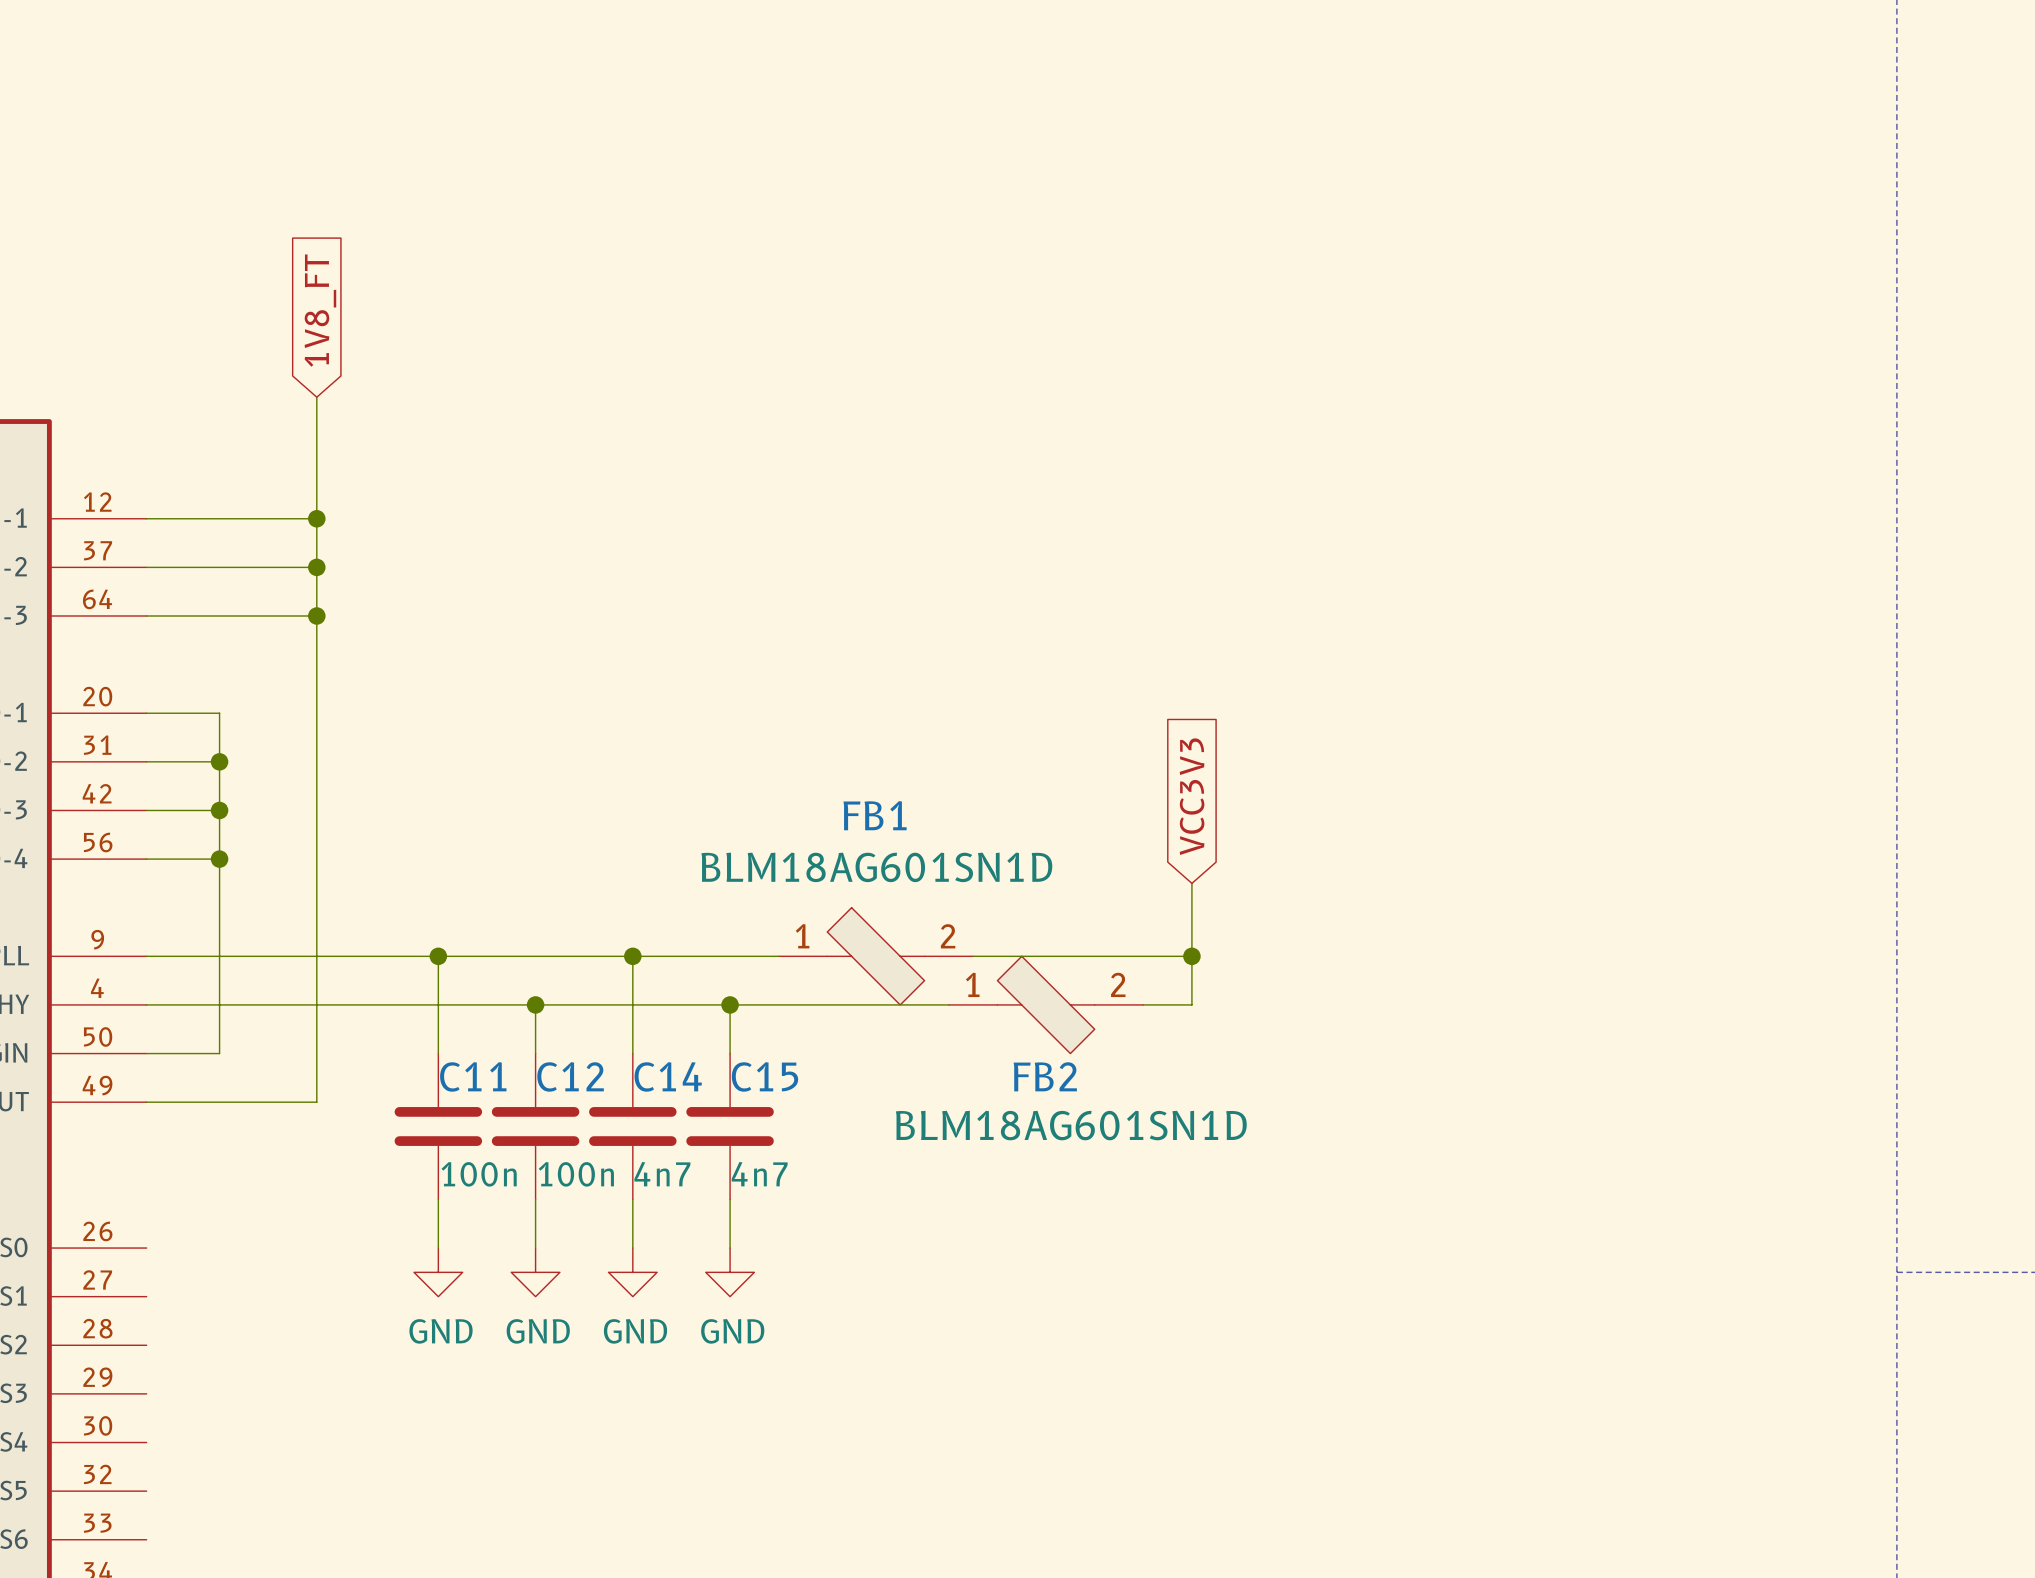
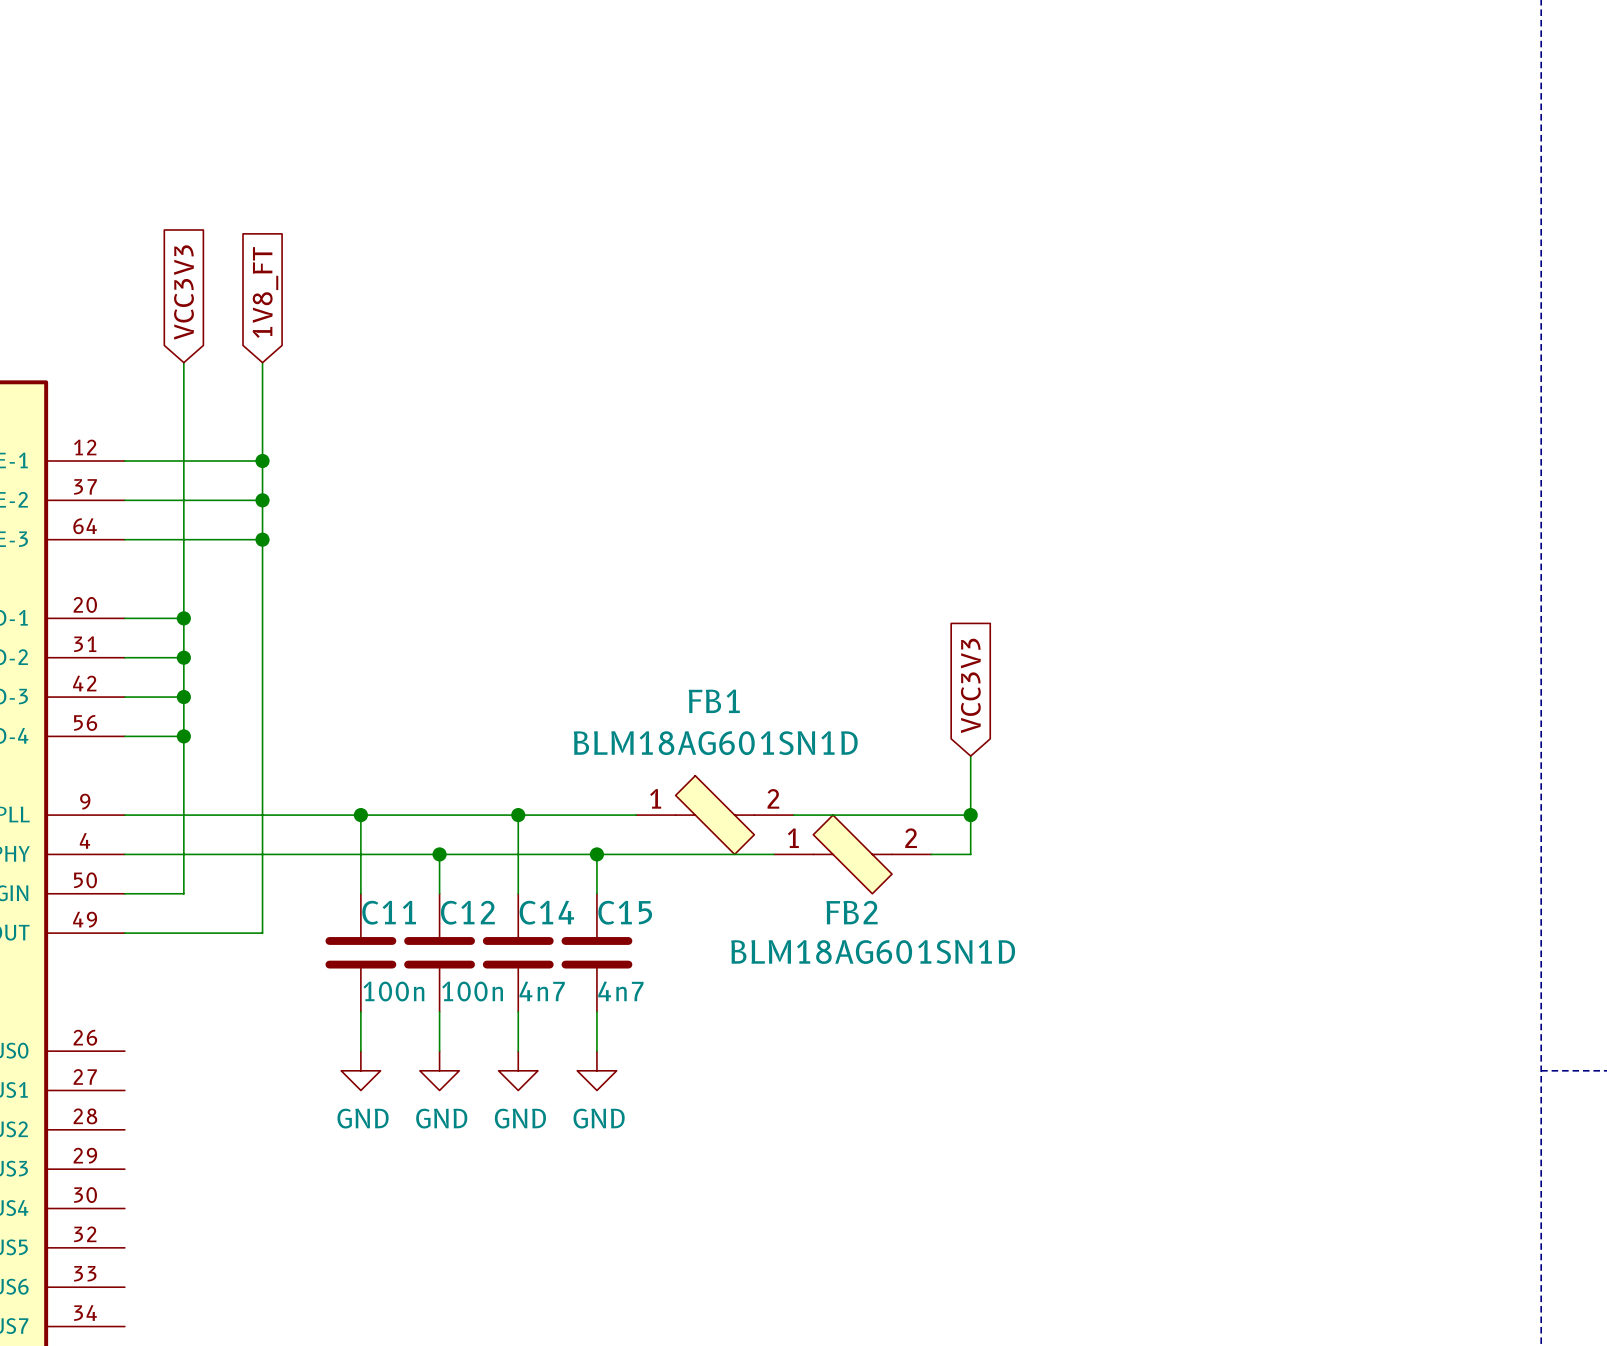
global label: none -> VCC3V3 (183, 292)
wire: none -> (183, 362) (183, 618)
junction: none -> (183, 618)

